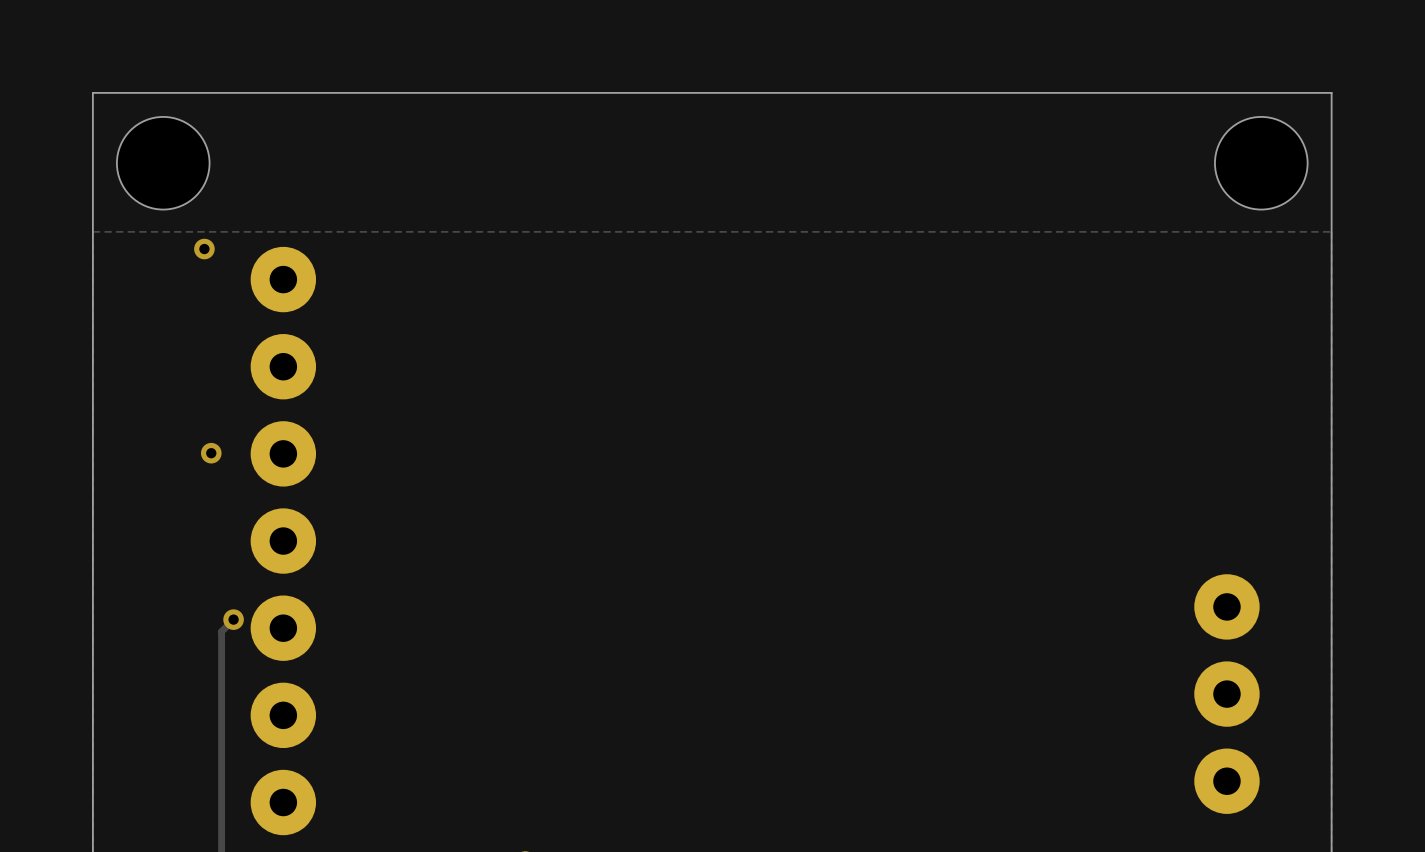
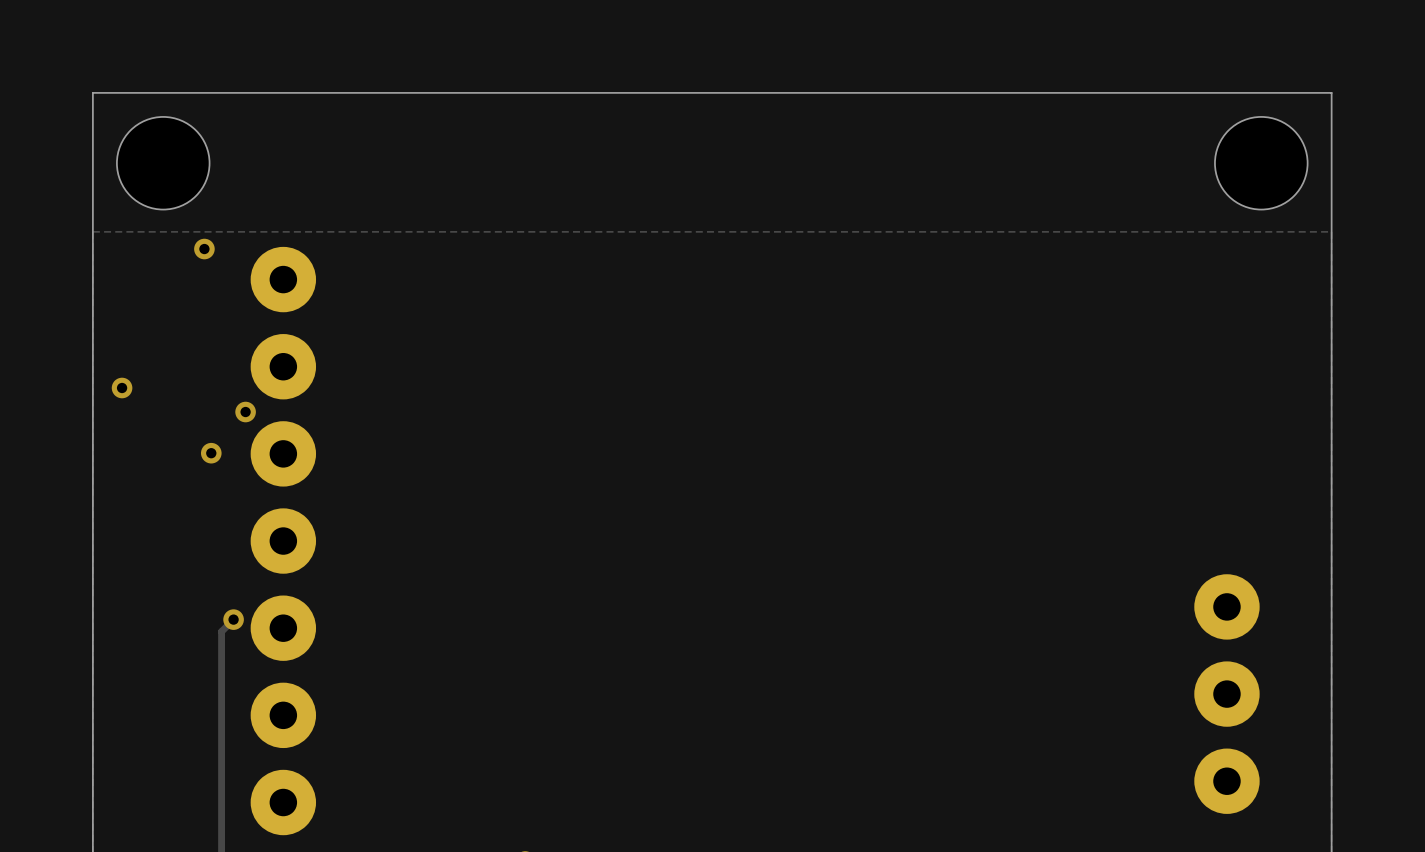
via: none -> (122, 388)
via: none -> (245, 412)

